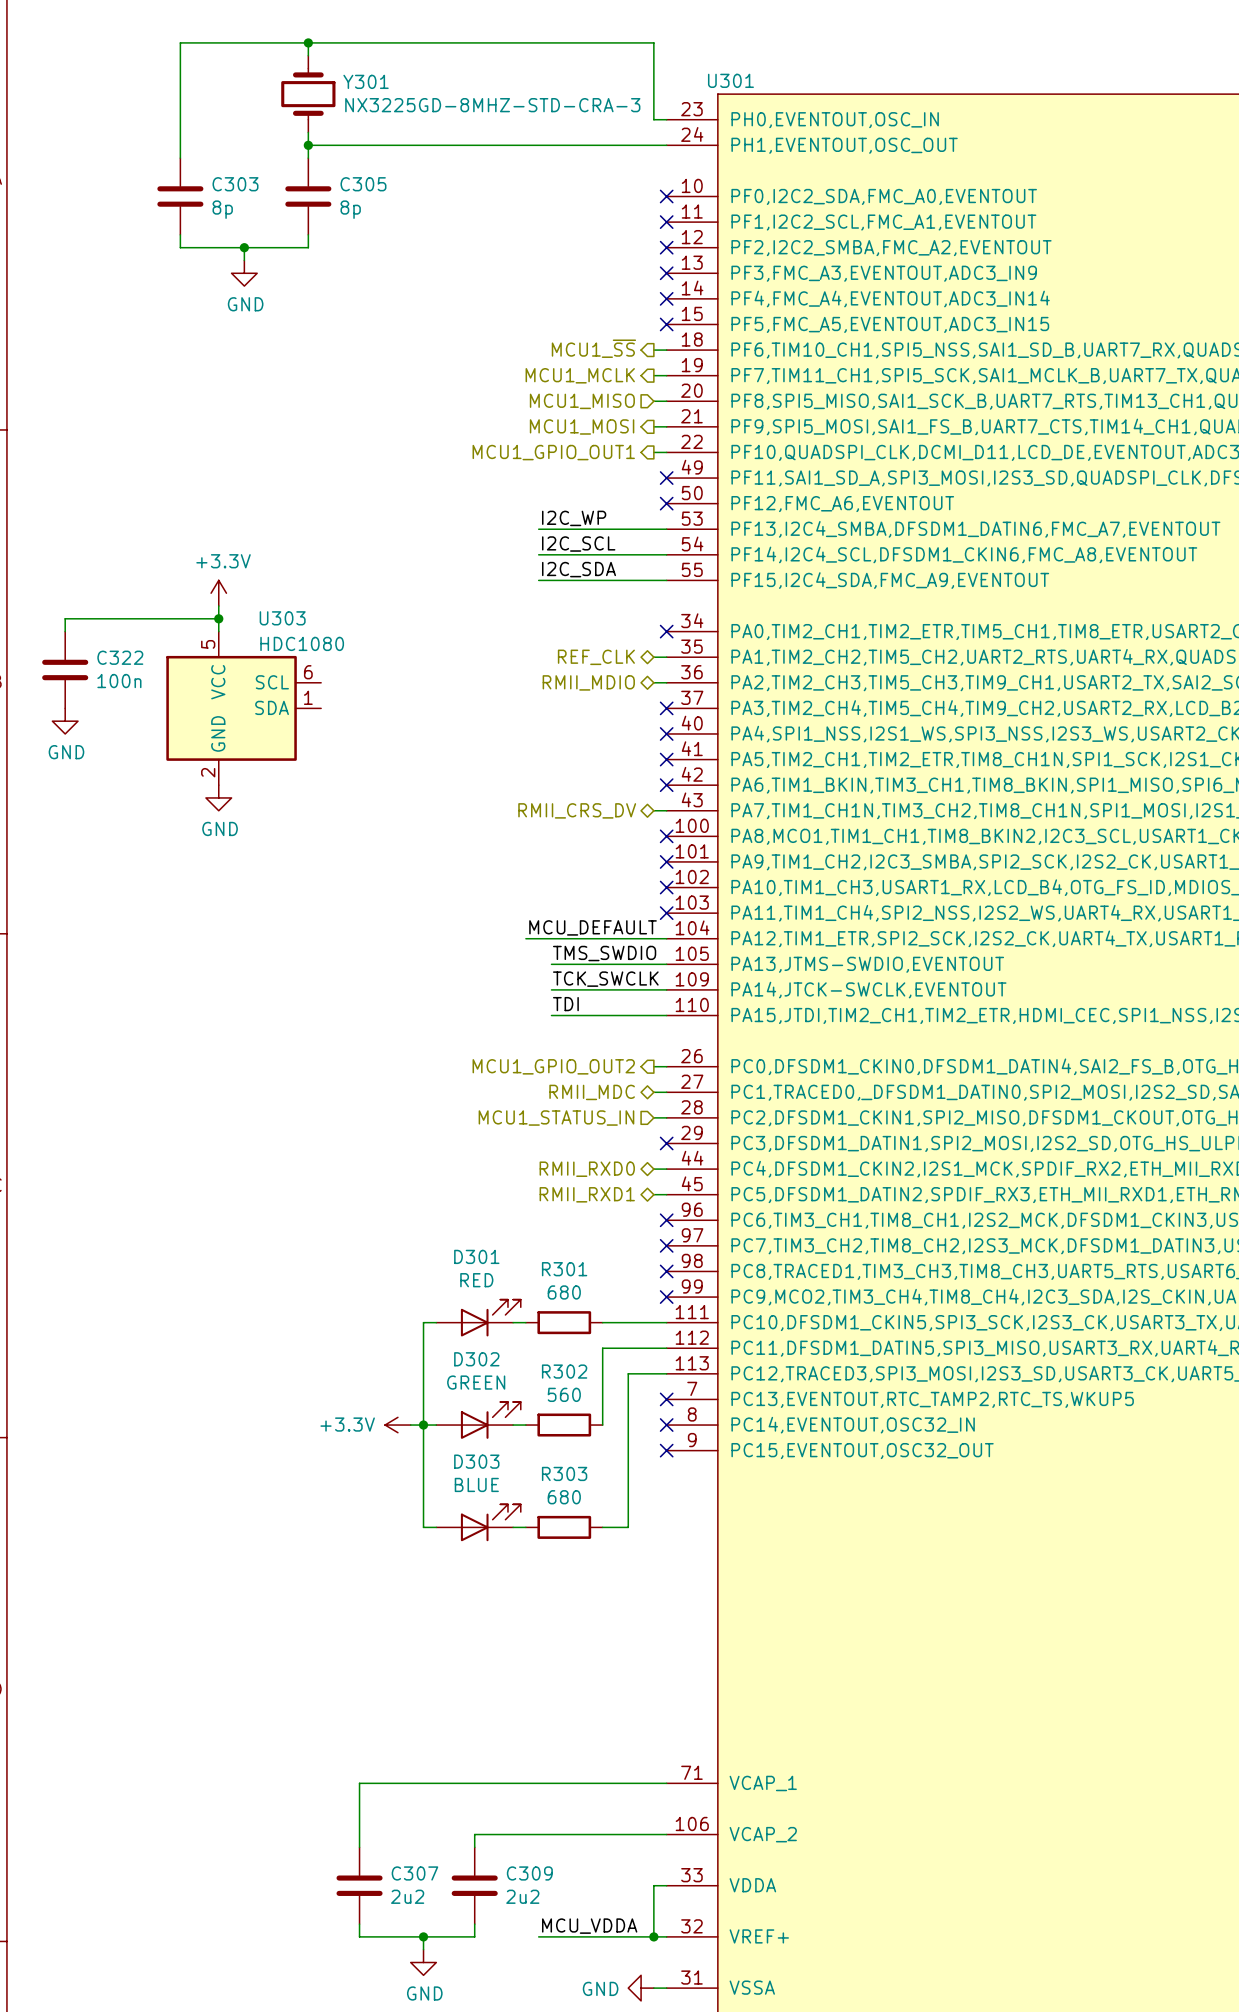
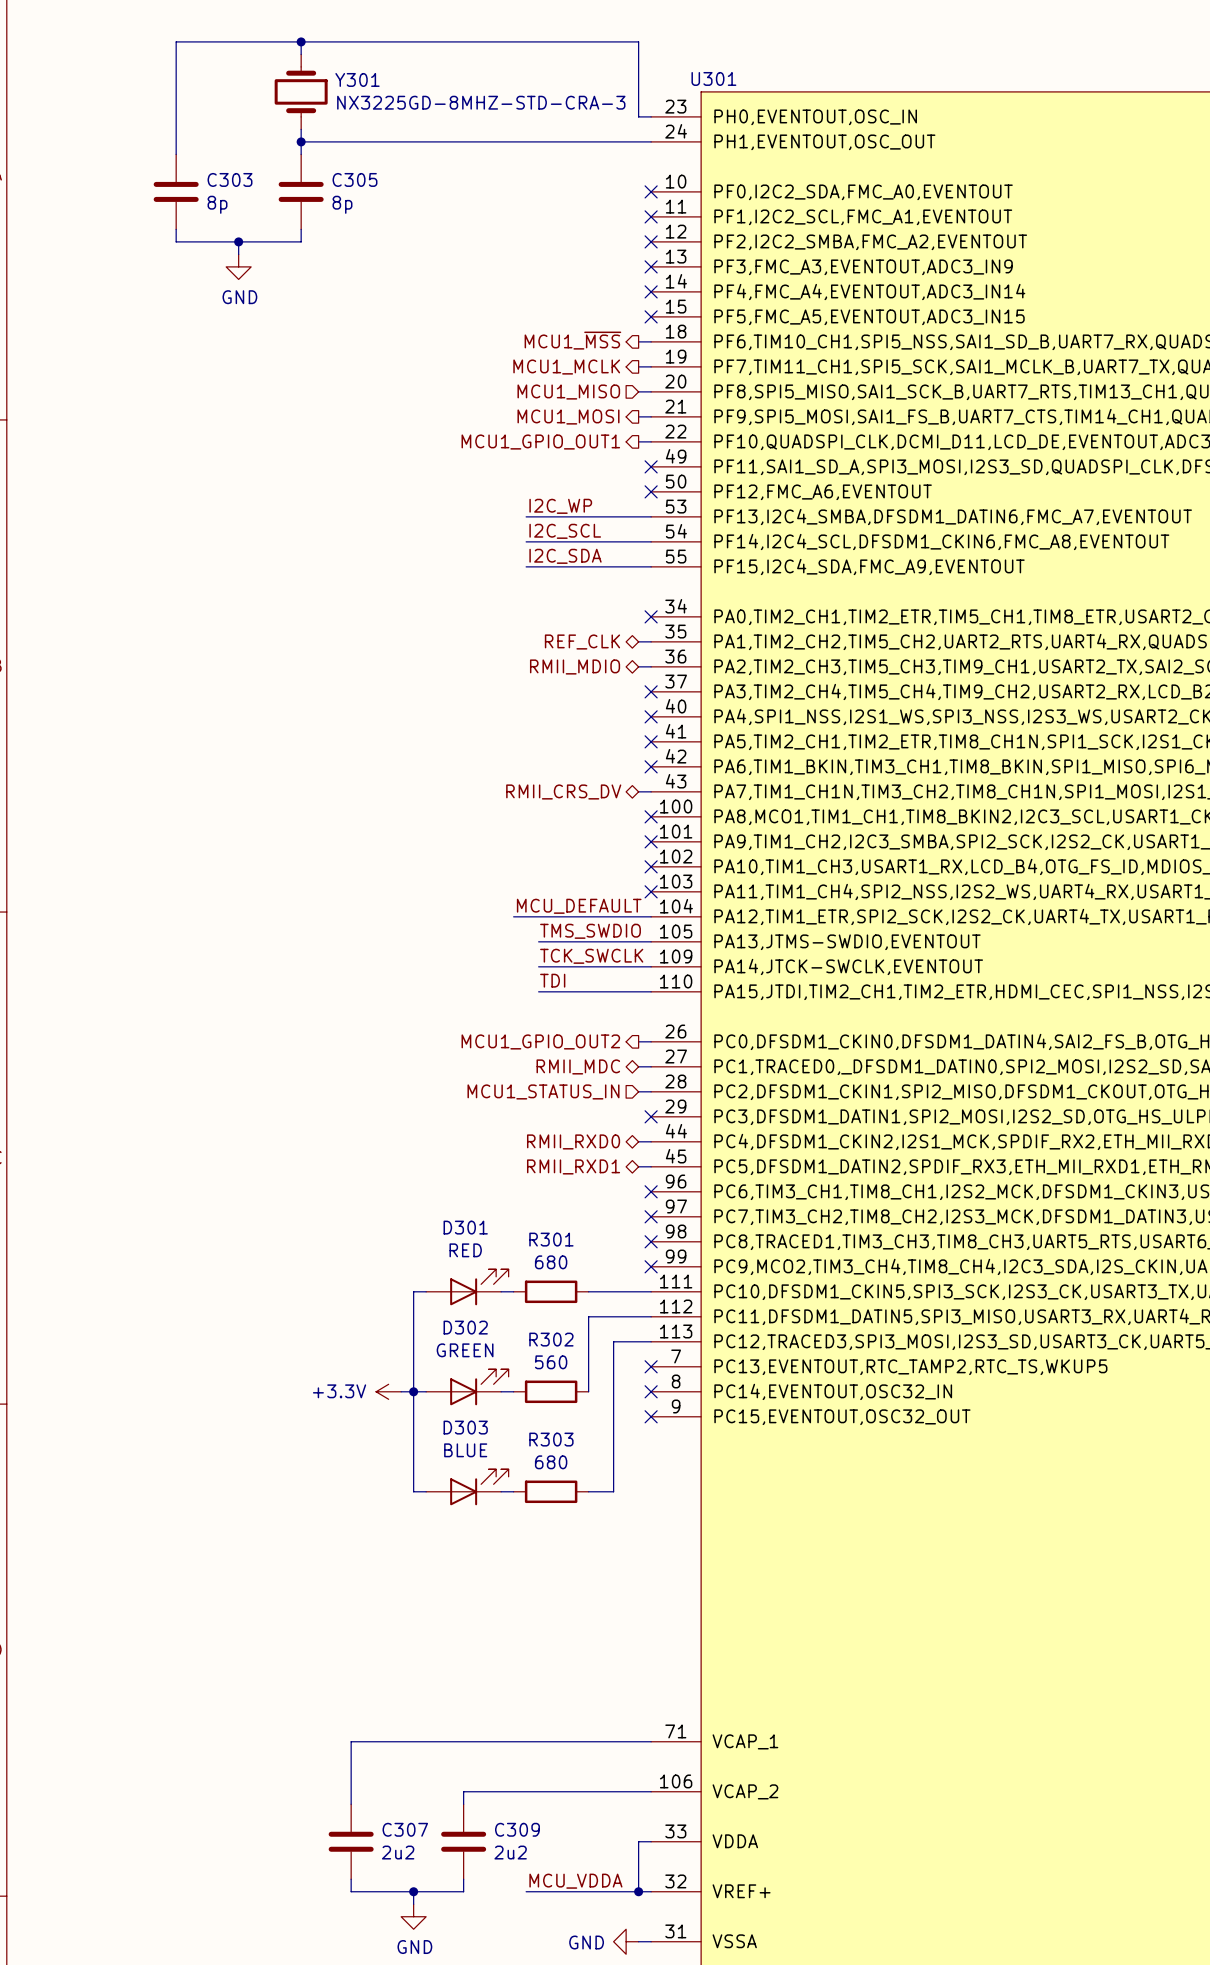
hierarchical label: MCU1_~{SS} (593, 348) -> MCU1_~{MSS} (572, 340)
power symbol: +3.3V (218, 593) -> none
wire: (218, 606) (218, 631) -> none
wire: (218, 618) (65, 618) (65, 631) -> none
junction: (218, 618) -> none
C322: 100n (65, 669) -> none
U303: HDC1080 (243, 708) -> none
power symbol: GND (65, 721) -> none
power symbol: GND (218, 797) -> none

